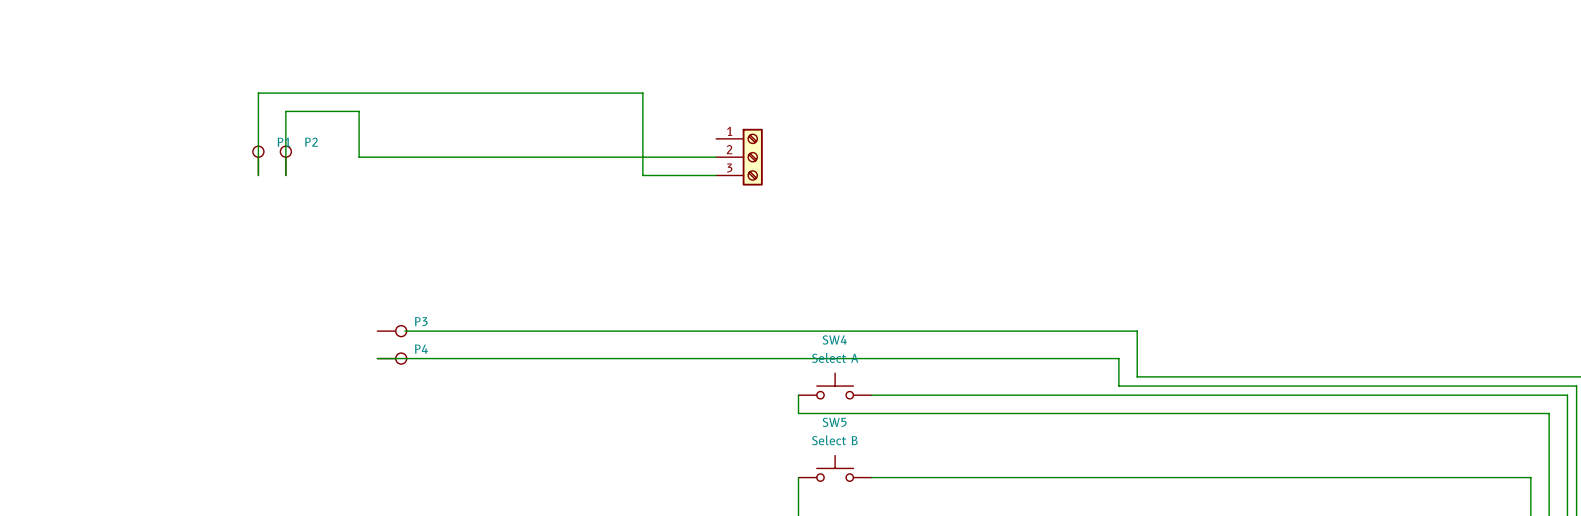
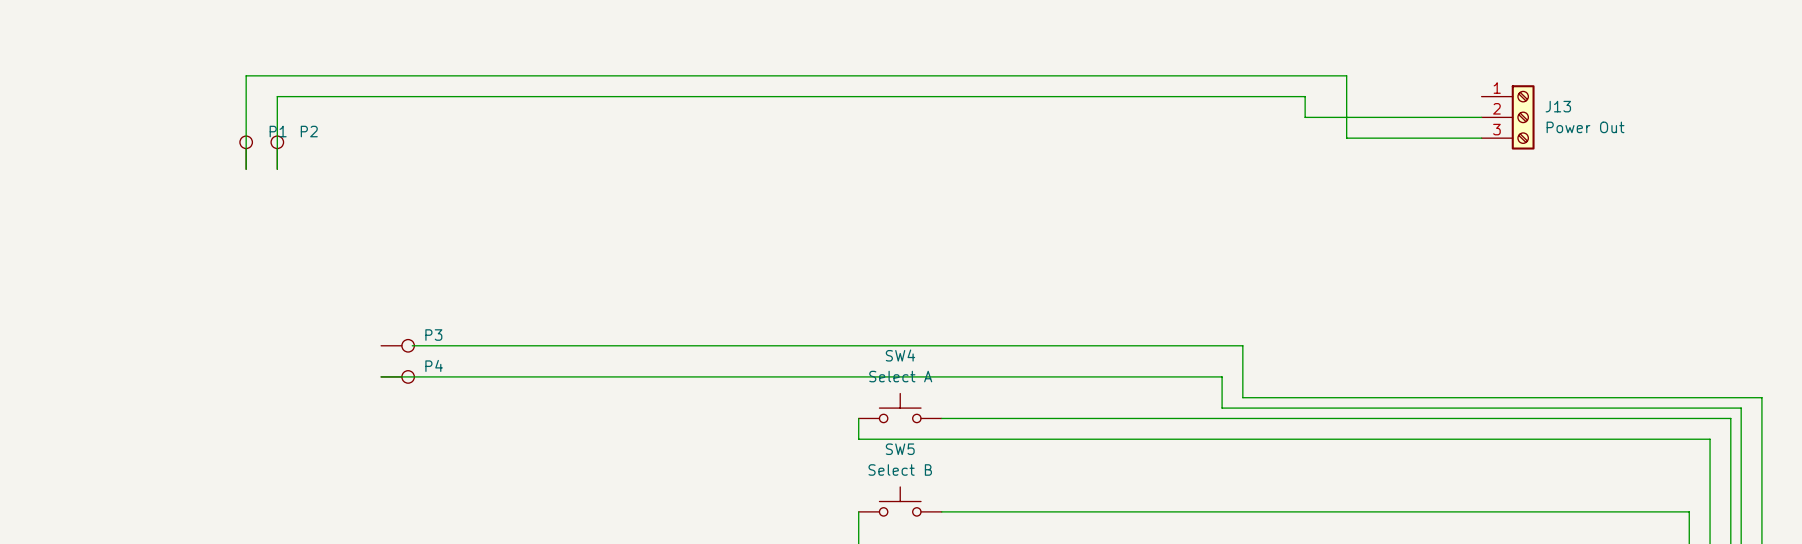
wire: (642, 93) (642, 175) (716, 175) -> (682, 75) (1346, 75) (1346, 138) (1481, 138)
wire: (359, 111) (359, 157) (716, 157) -> (360, 96) (1305, 96) (1305, 117) (1481, 117)
J13: none -> Power Out (1508, 117)
part: (739, 157) -> none

